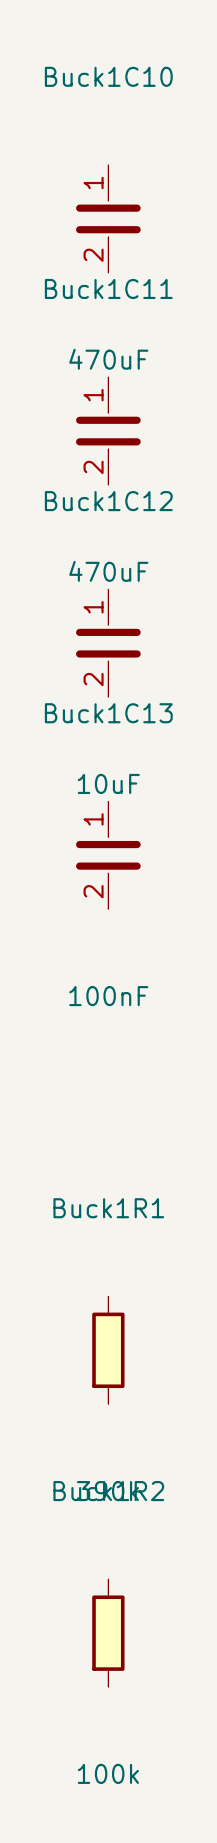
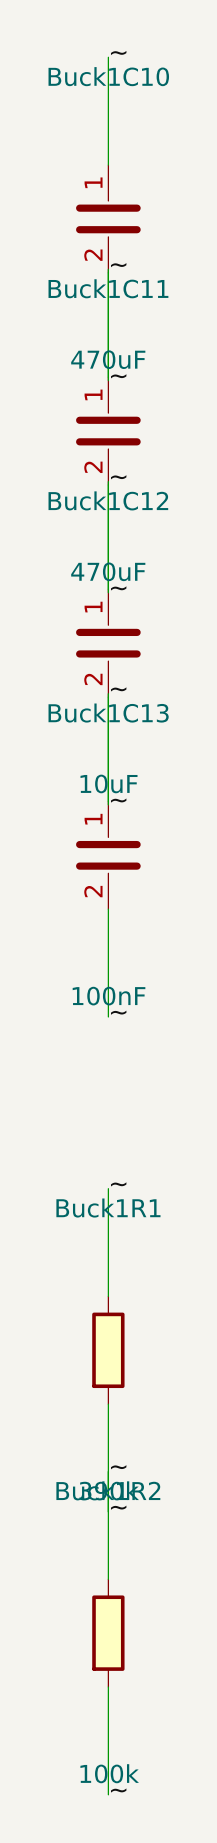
label: none -> ~ (118, 53)
wire: none -> (108, 57) (108, 165)
label: none -> ~ (118, 265)
wire: none -> (108, 269) (108, 380)
label: none -> ~ (118, 376)
label: none -> ~ (118, 477)
wire: none -> (108, 481) (108, 592)
label: none -> ~ (118, 588)
label: none -> ~ (118, 689)
wire: none -> (108, 693) (108, 804)
label: none -> ~ (118, 800)
wire: none -> (108, 909) (108, 1016)
label: none -> ~ (118, 1012)
label: none -> ~ (118, 1184)
wire: none -> (108, 1188) (108, 1296)
wire: none -> (108, 1404) (108, 1579)
label: none -> ~ (118, 1467)
label: none -> ~ (118, 1507)
wire: none -> (108, 1687) (108, 1794)
label: none -> ~ (118, 1790)

